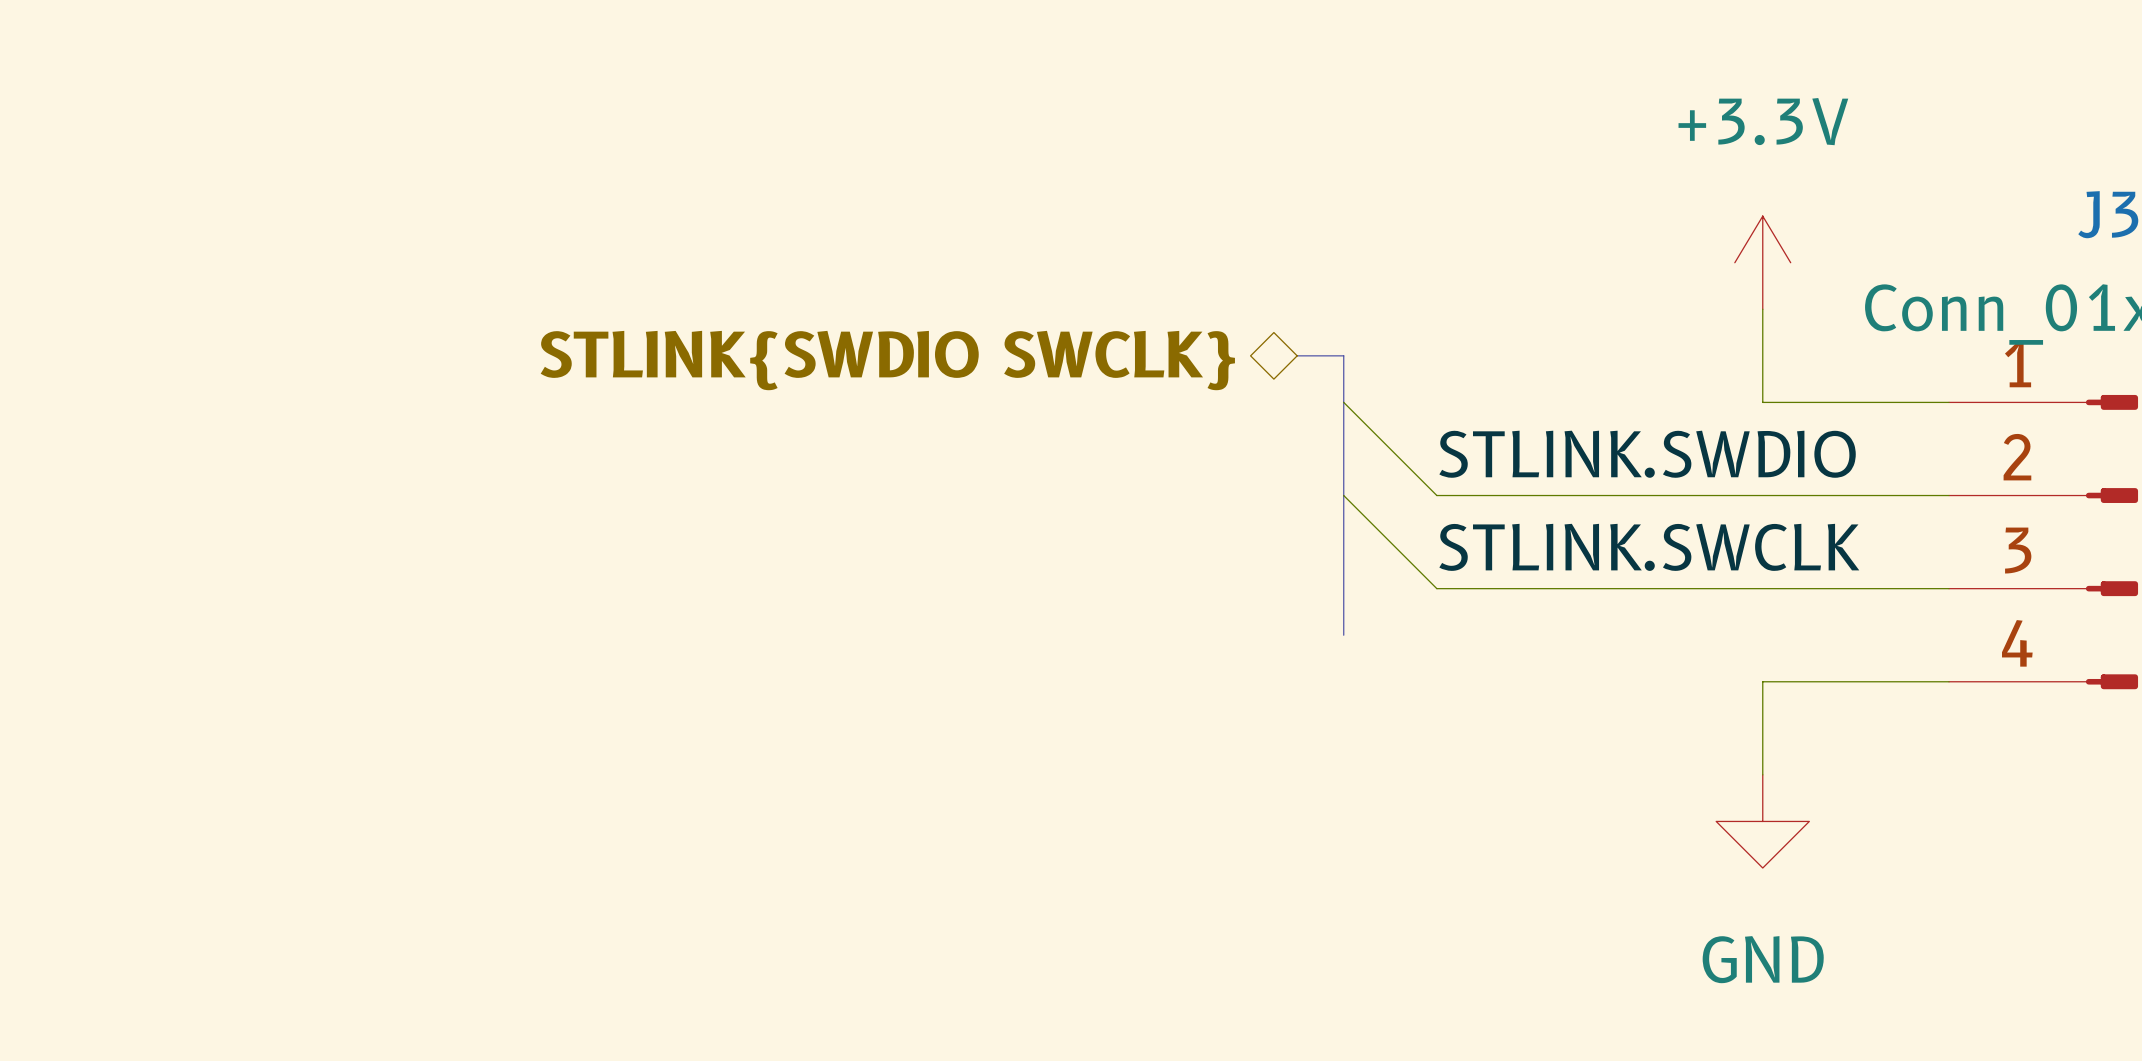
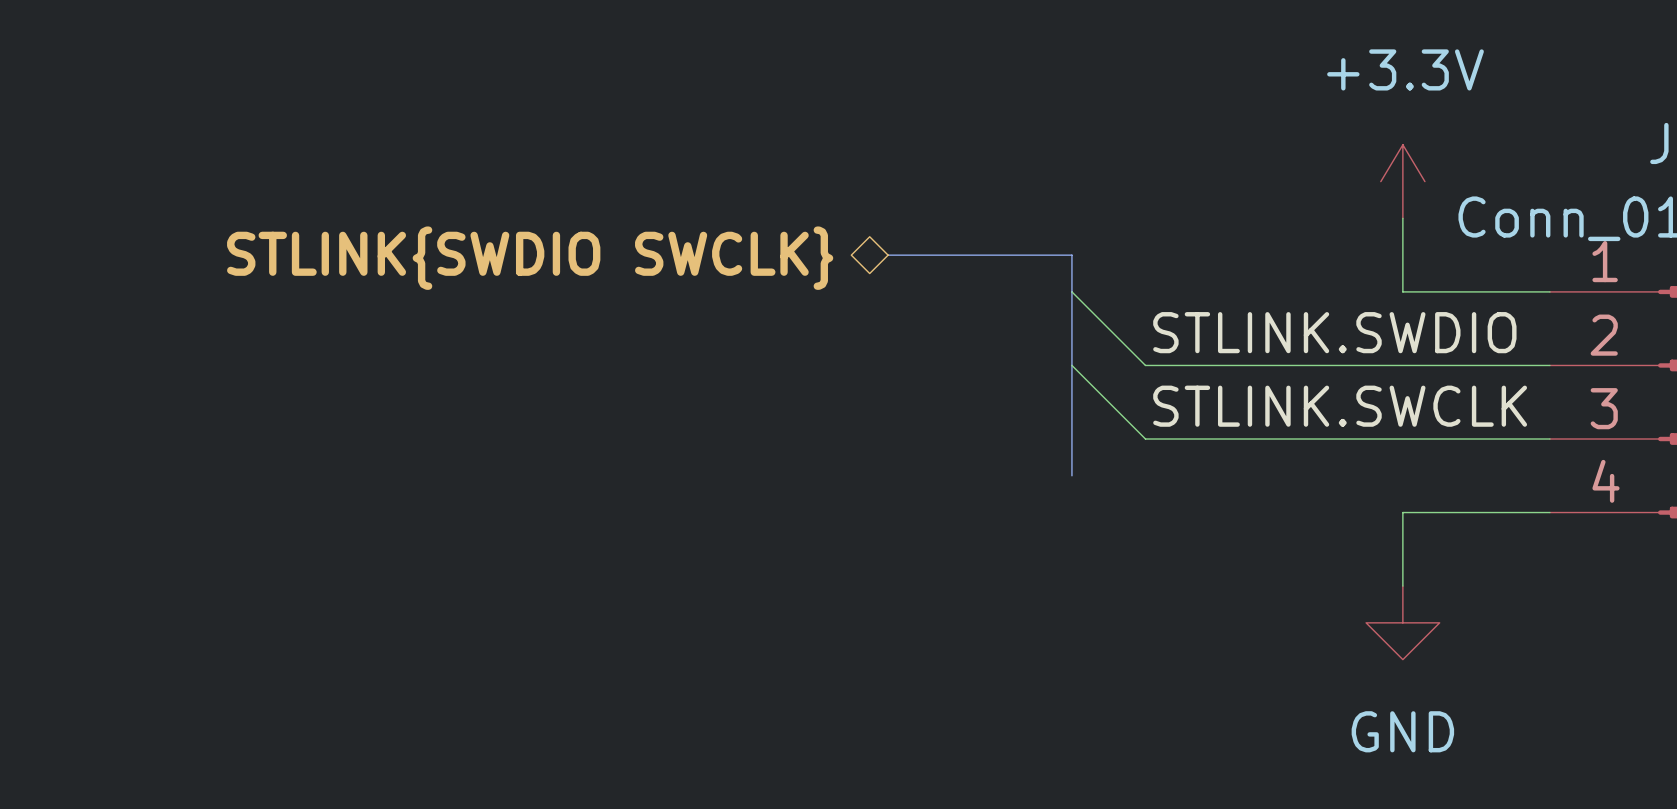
bus: none -> (888, 255) (1035, 255)
hierarchical label position: STLINK{SWDIO SWCLK} (887, 360) -> STLINK{SWDIO SWCLK} (530, 258)

